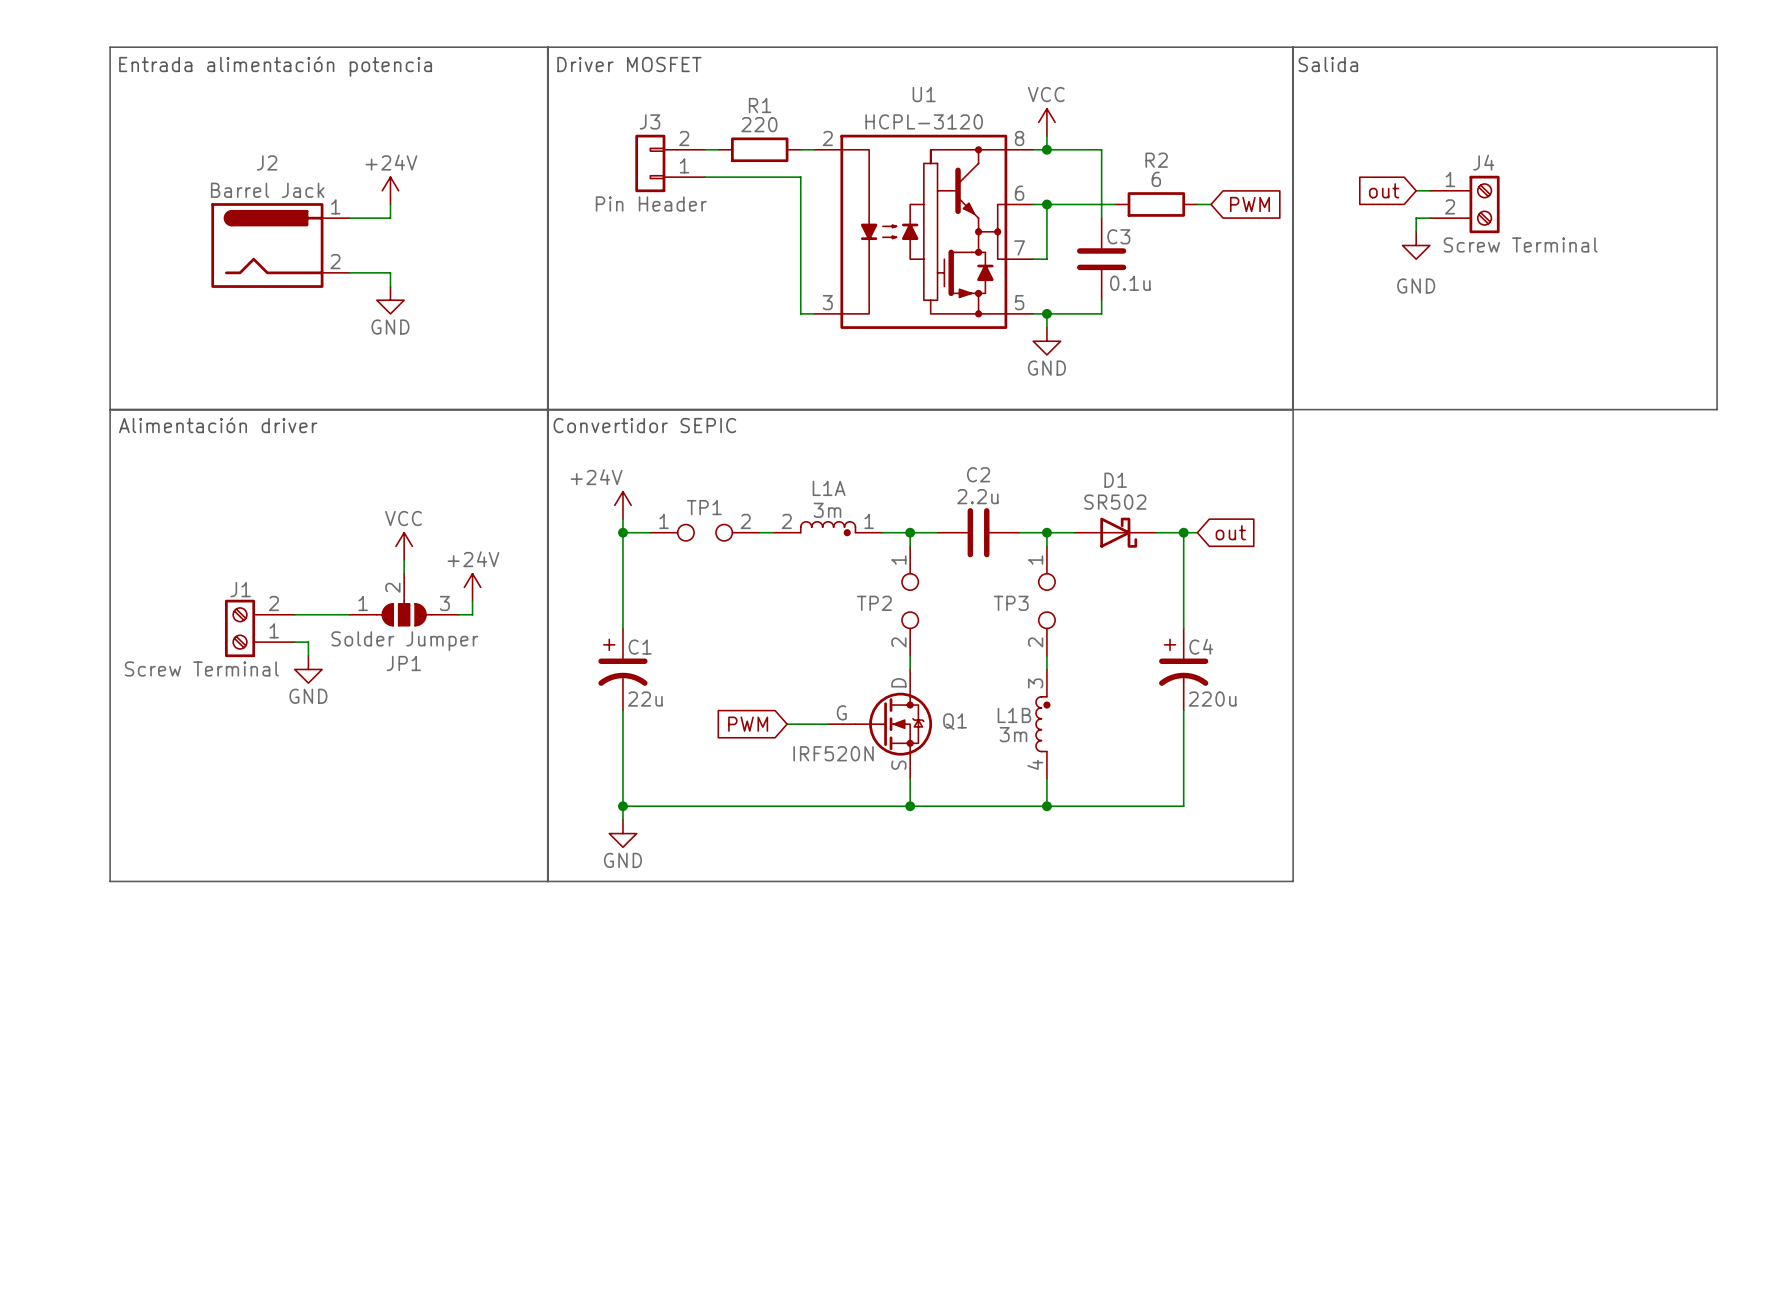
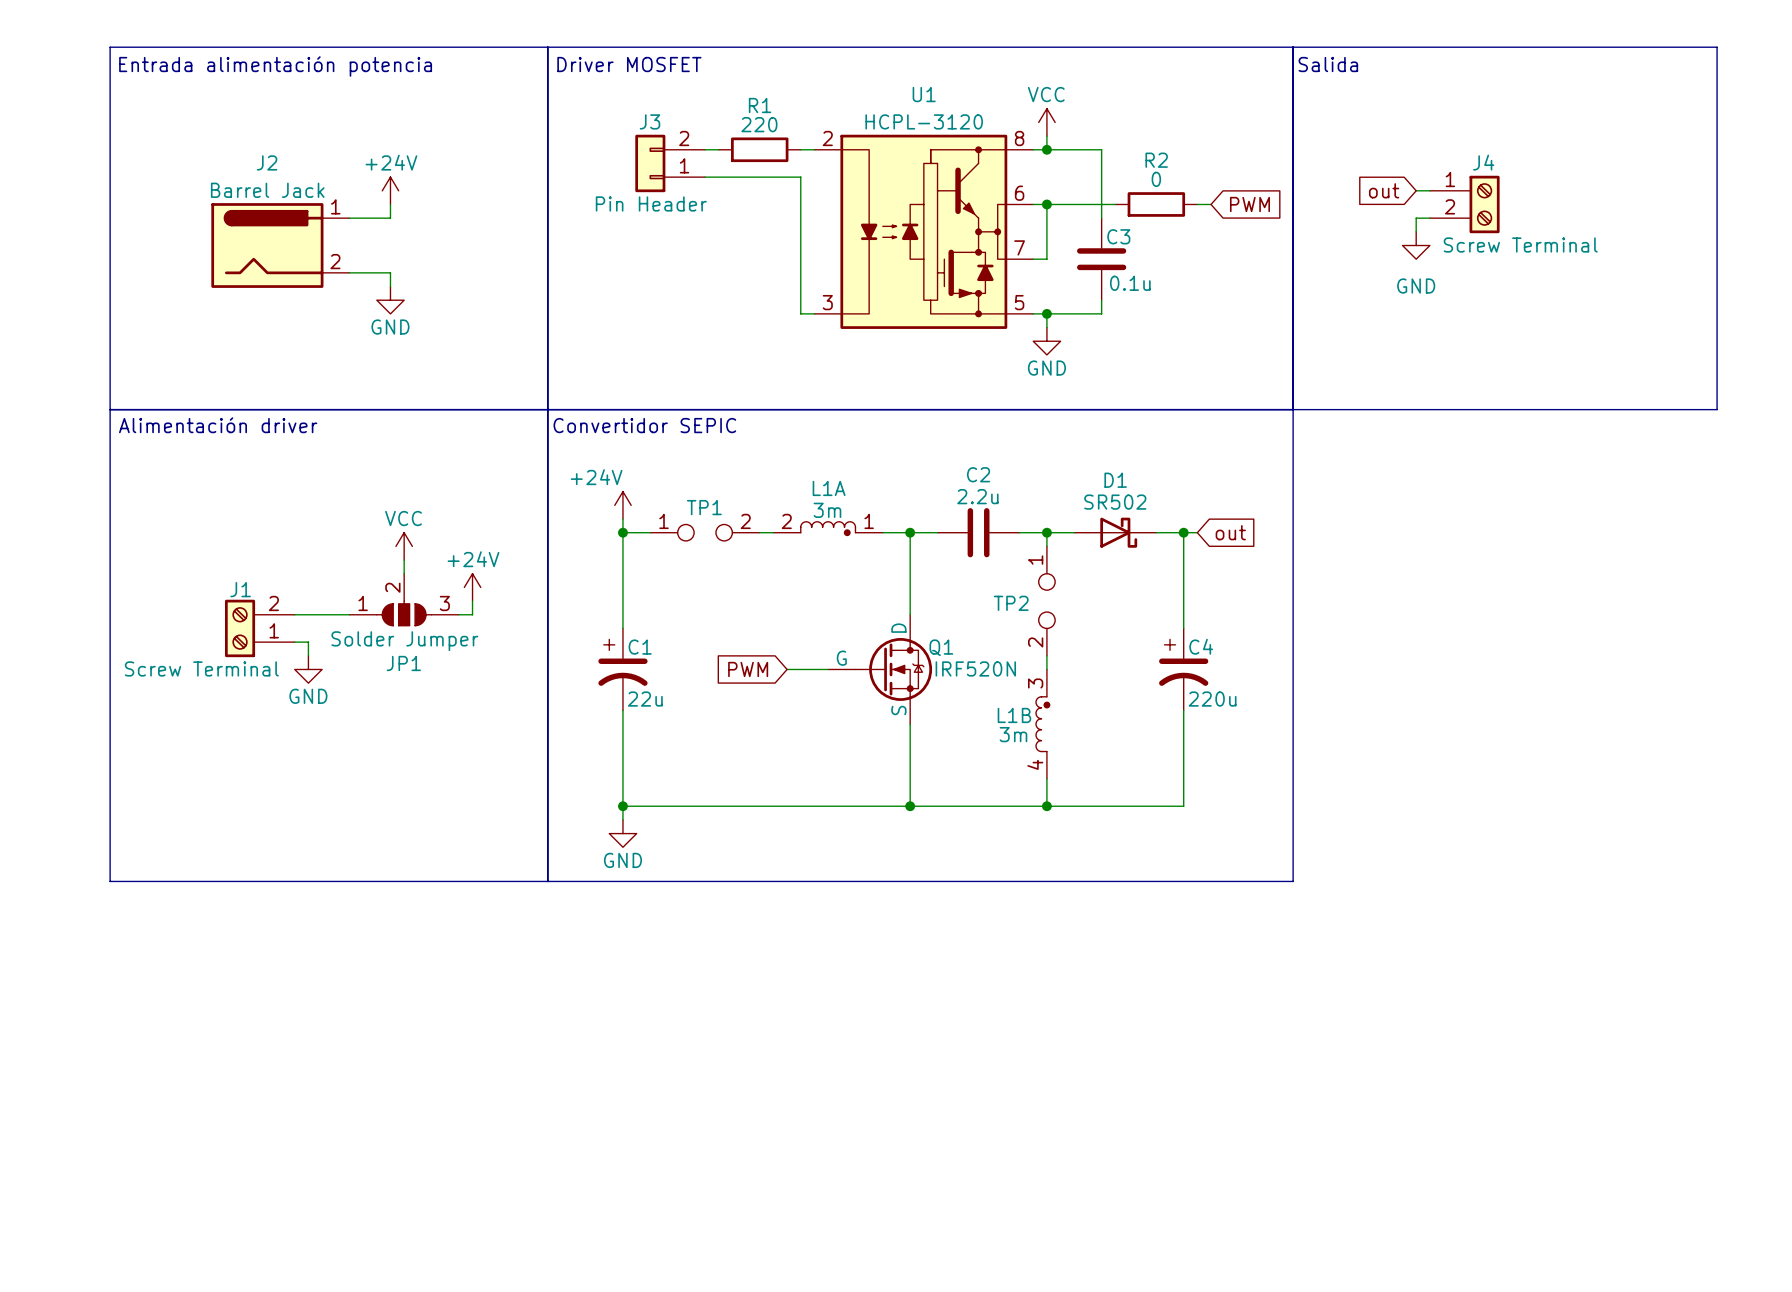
R2 value: 6 (1156, 179) -> 0 (1156, 179)
wire: none -> (910, 546) (910, 614)
TP2: (910, 601) -> none
TP3 name: TP3 (1011, 603) -> TP2 (1011, 603)
wire: (910, 655) (910, 669) -> none
Q1 name position: Q1 (955, 721) -> Q1 (941, 647)
global label position: PWM (748, 724) -> PWM (748, 669)
wire: (787, 724) (828, 724) -> (787, 669) (828, 669)
Q1 position: (880, 724) -> (880, 669)
Q1 value position: IRF520N (833, 753) -> IRF520N (975, 668)

